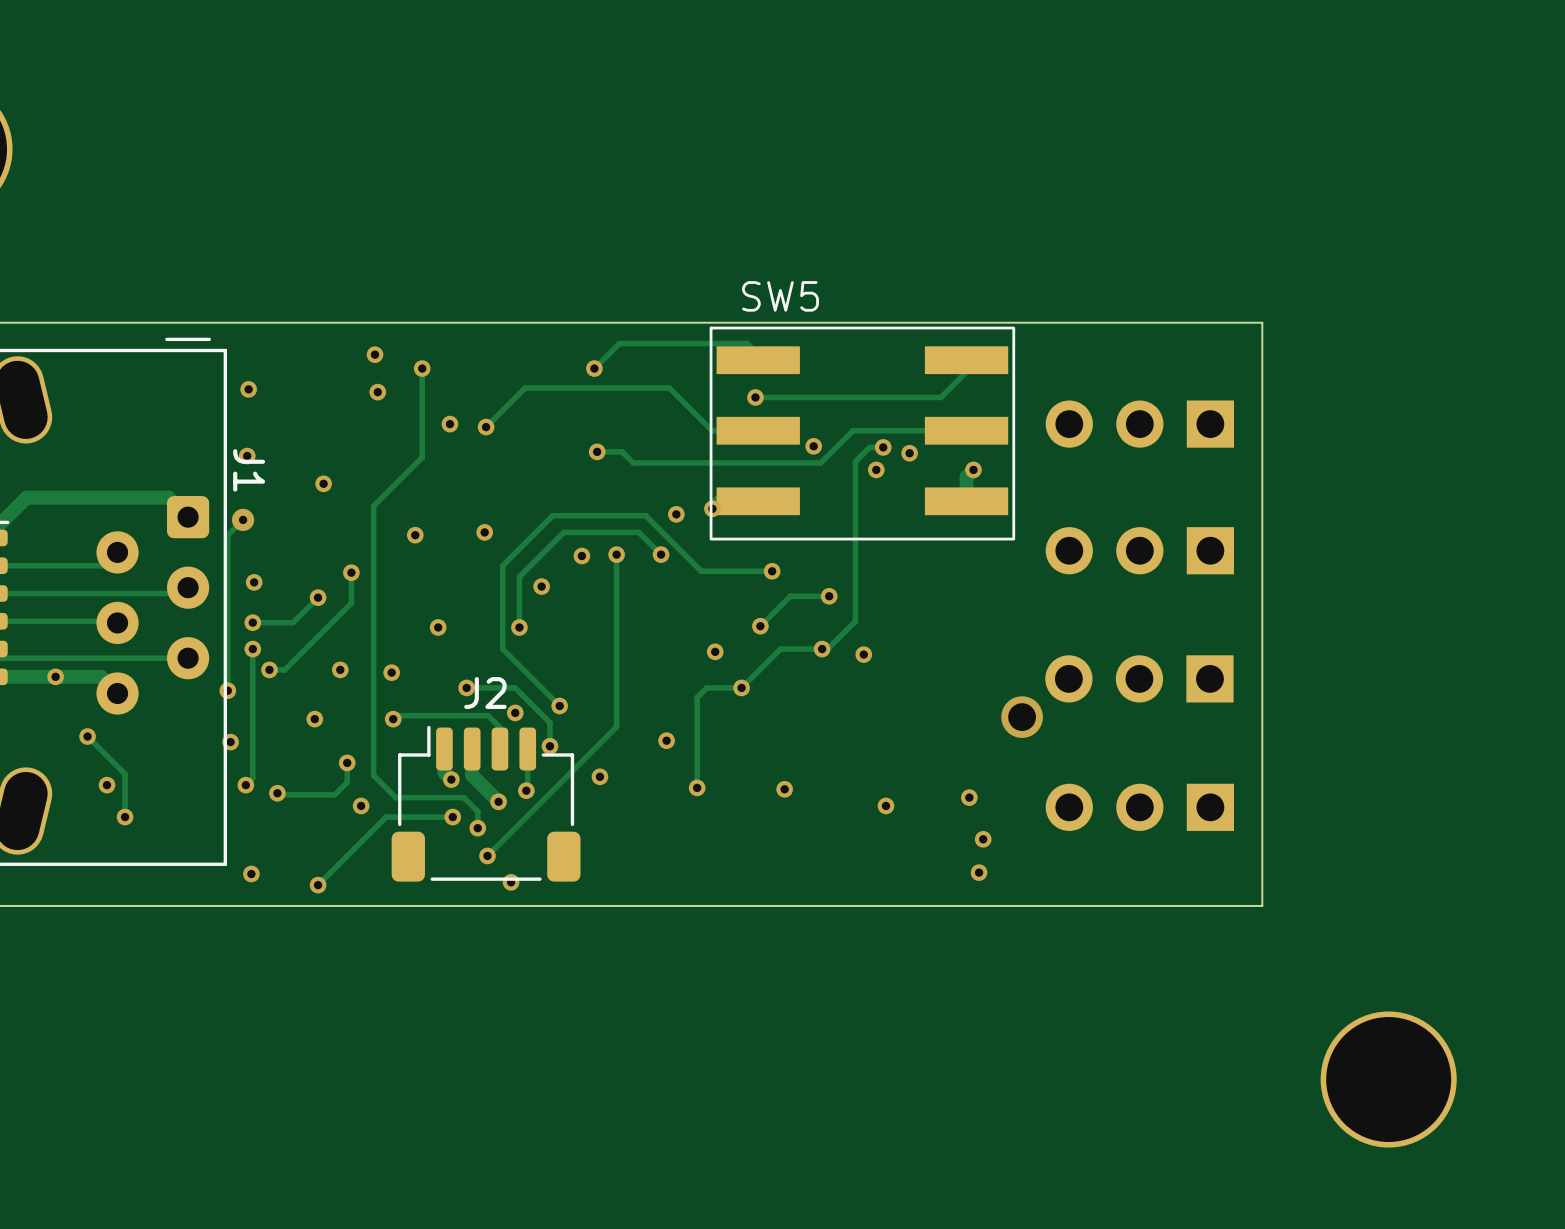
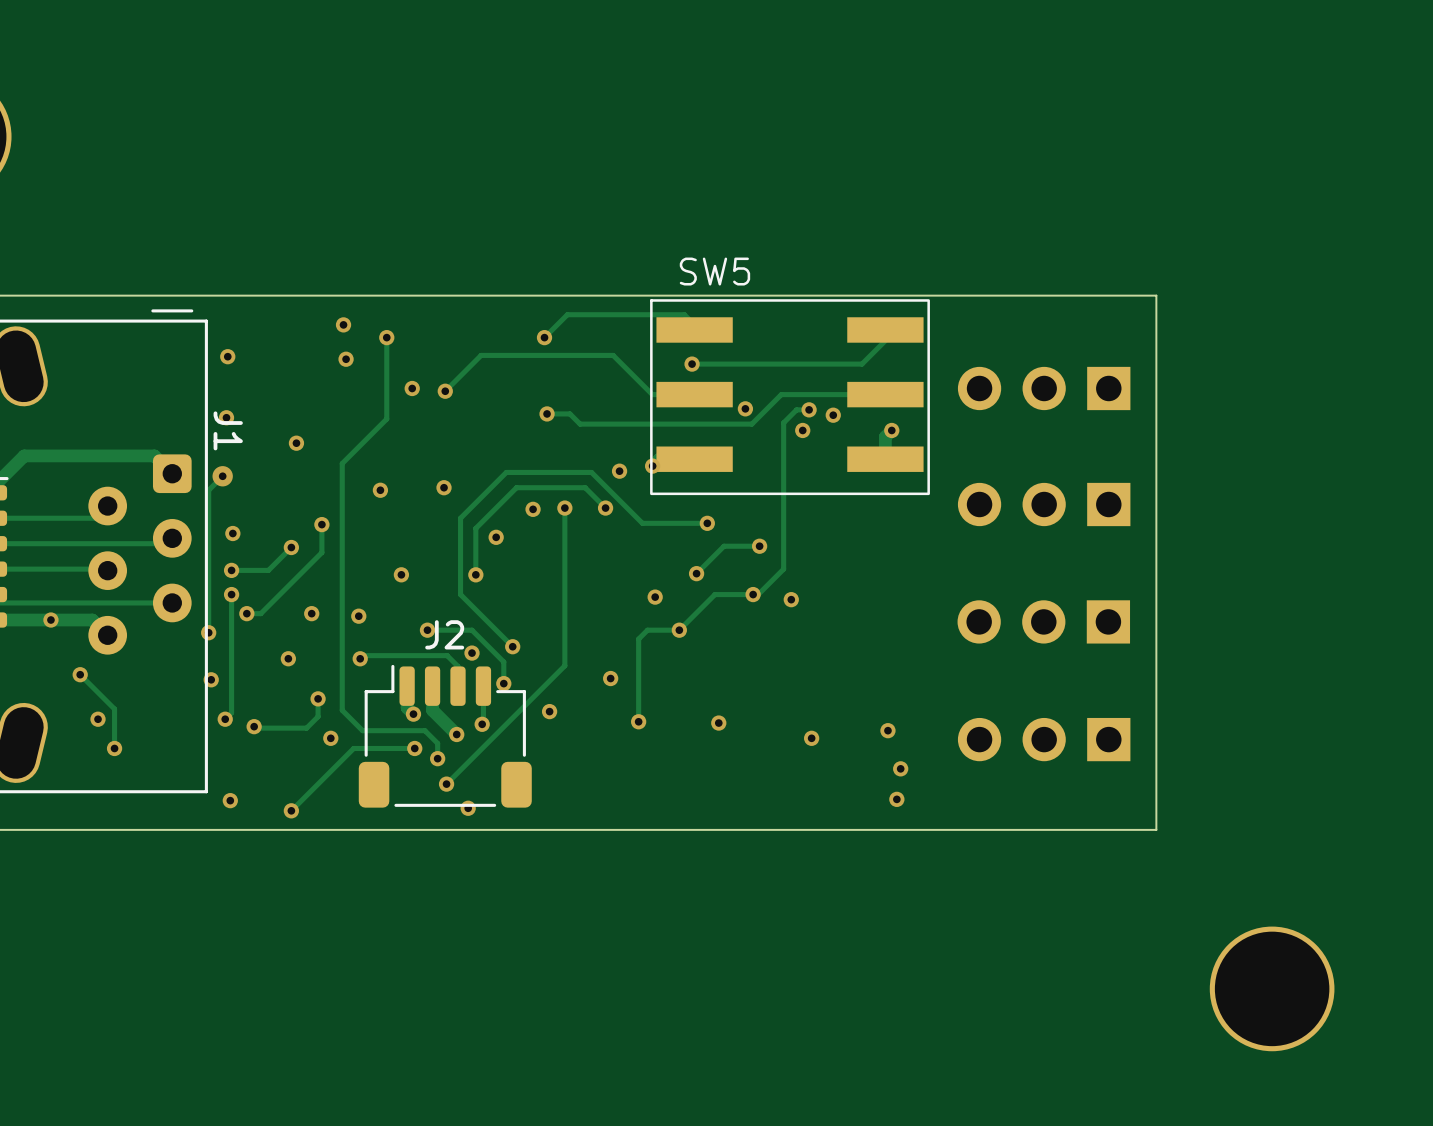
via: (1022, 717) -> none

